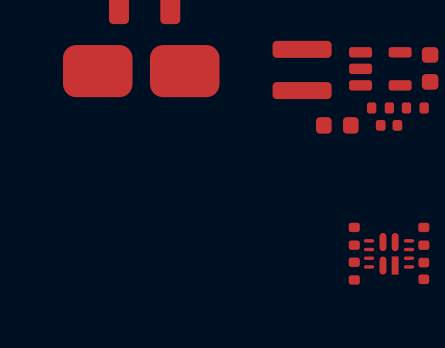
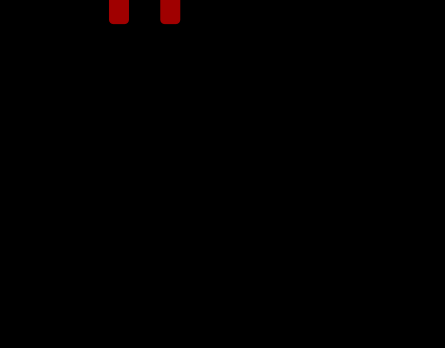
part: (380, 68) -> none
part: (430, 68) -> none
part: (302, 69) -> none
part: (97, 71) -> none
part: (184, 71) -> none
part: (380, 107) -> none
part: (415, 107) -> none
part: (337, 125) -> none
part: (389, 125) -> none
part: (354, 236) -> none
part: (423, 236) -> none
part: (389, 253) -> none
part: (423, 270) -> none
part: (354, 271) -> none

